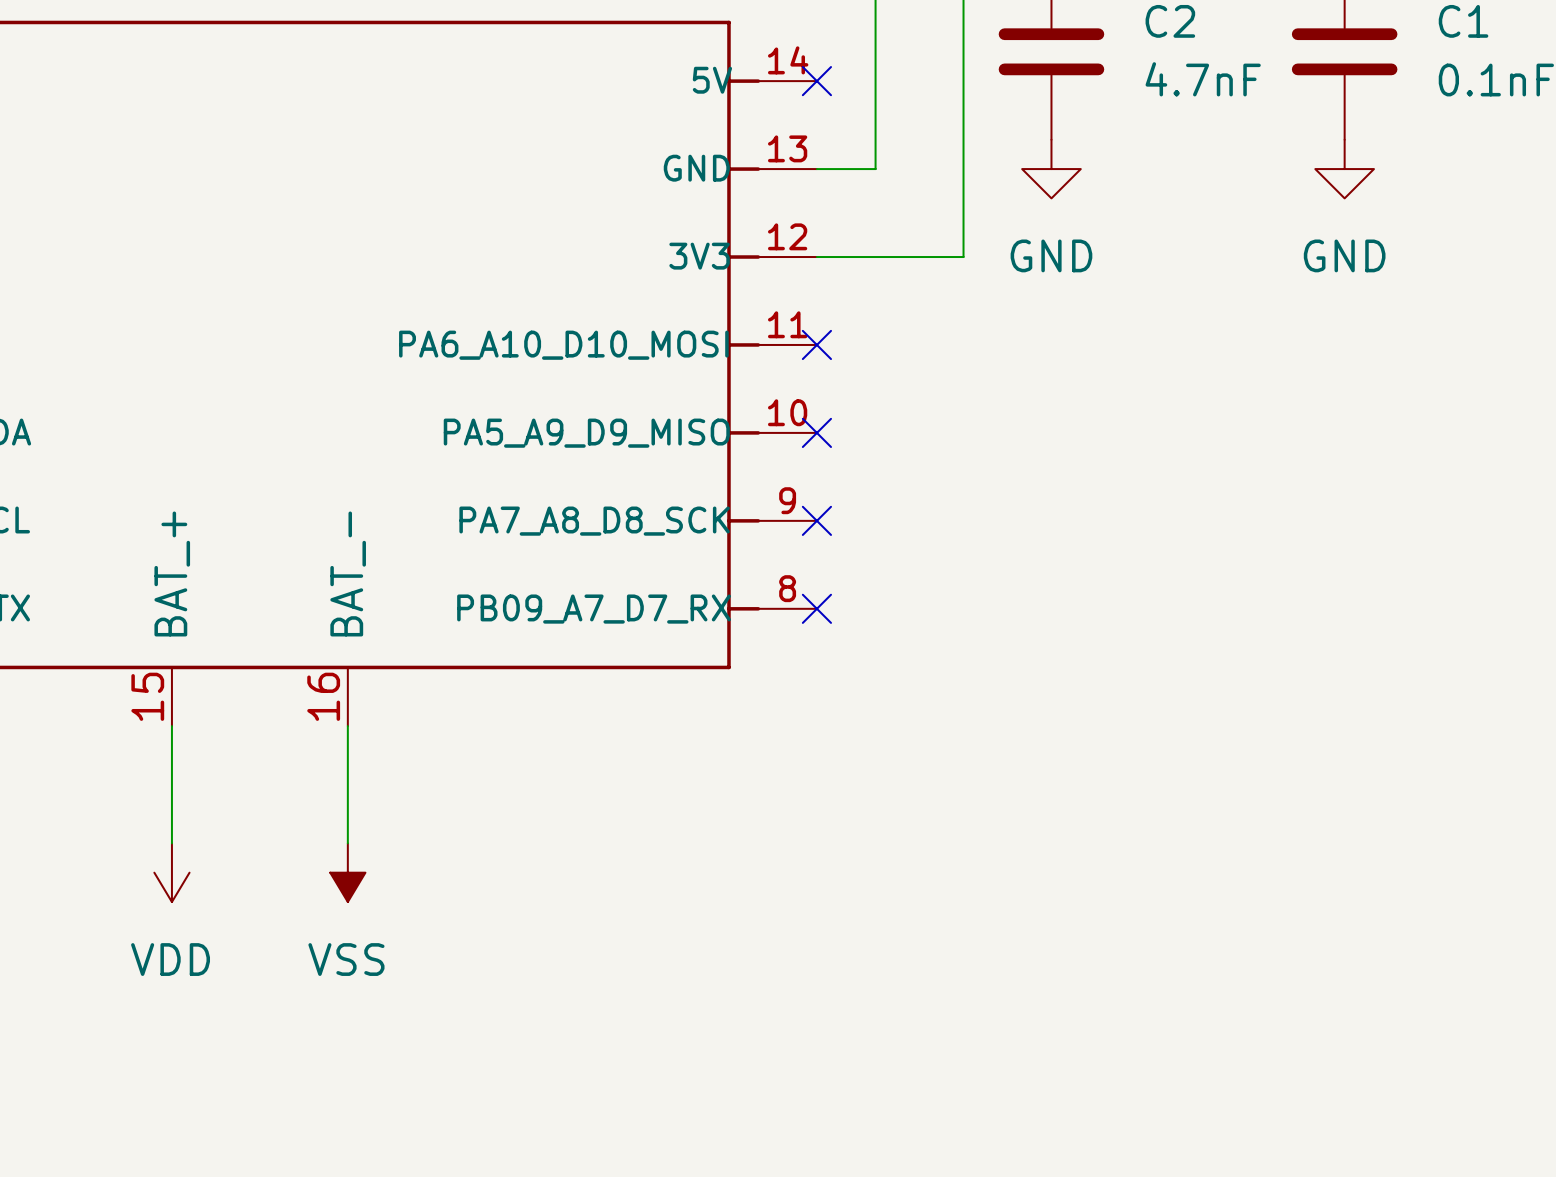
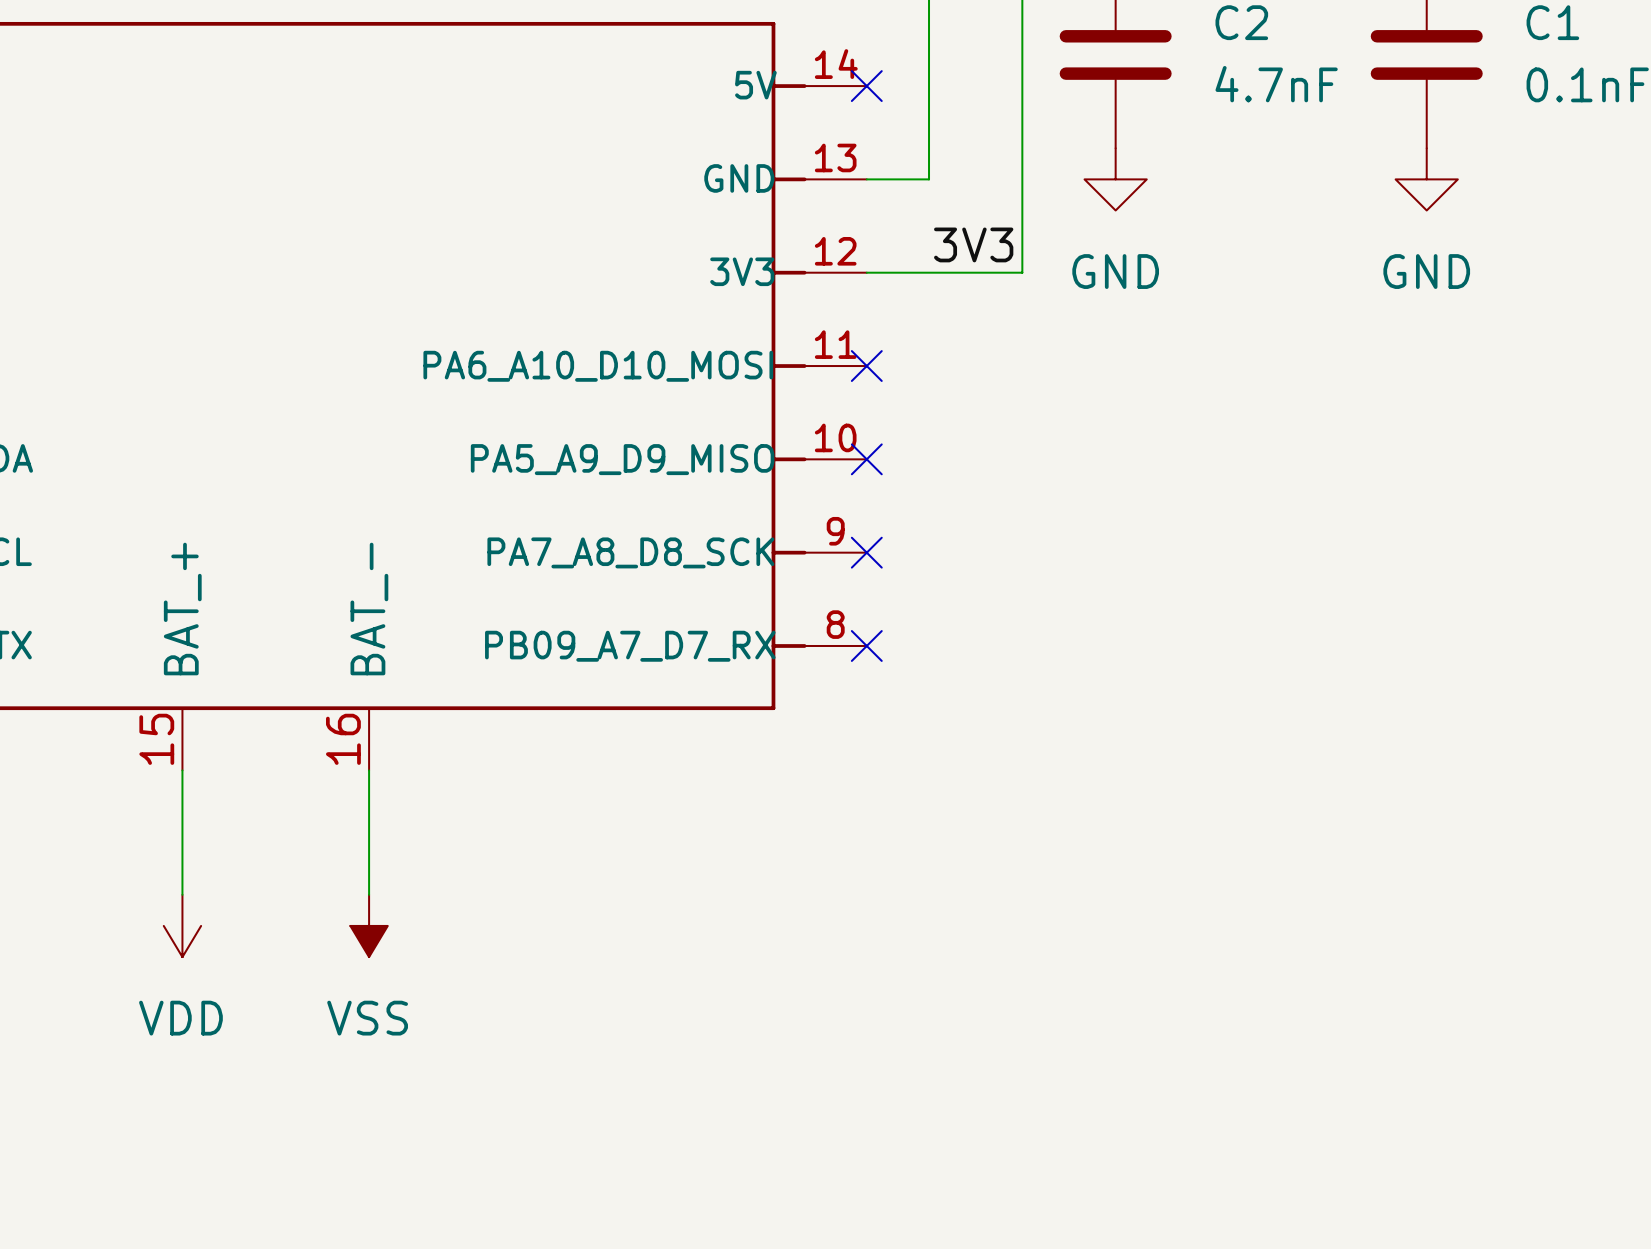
label: none -> 3V3 (973, 244)

